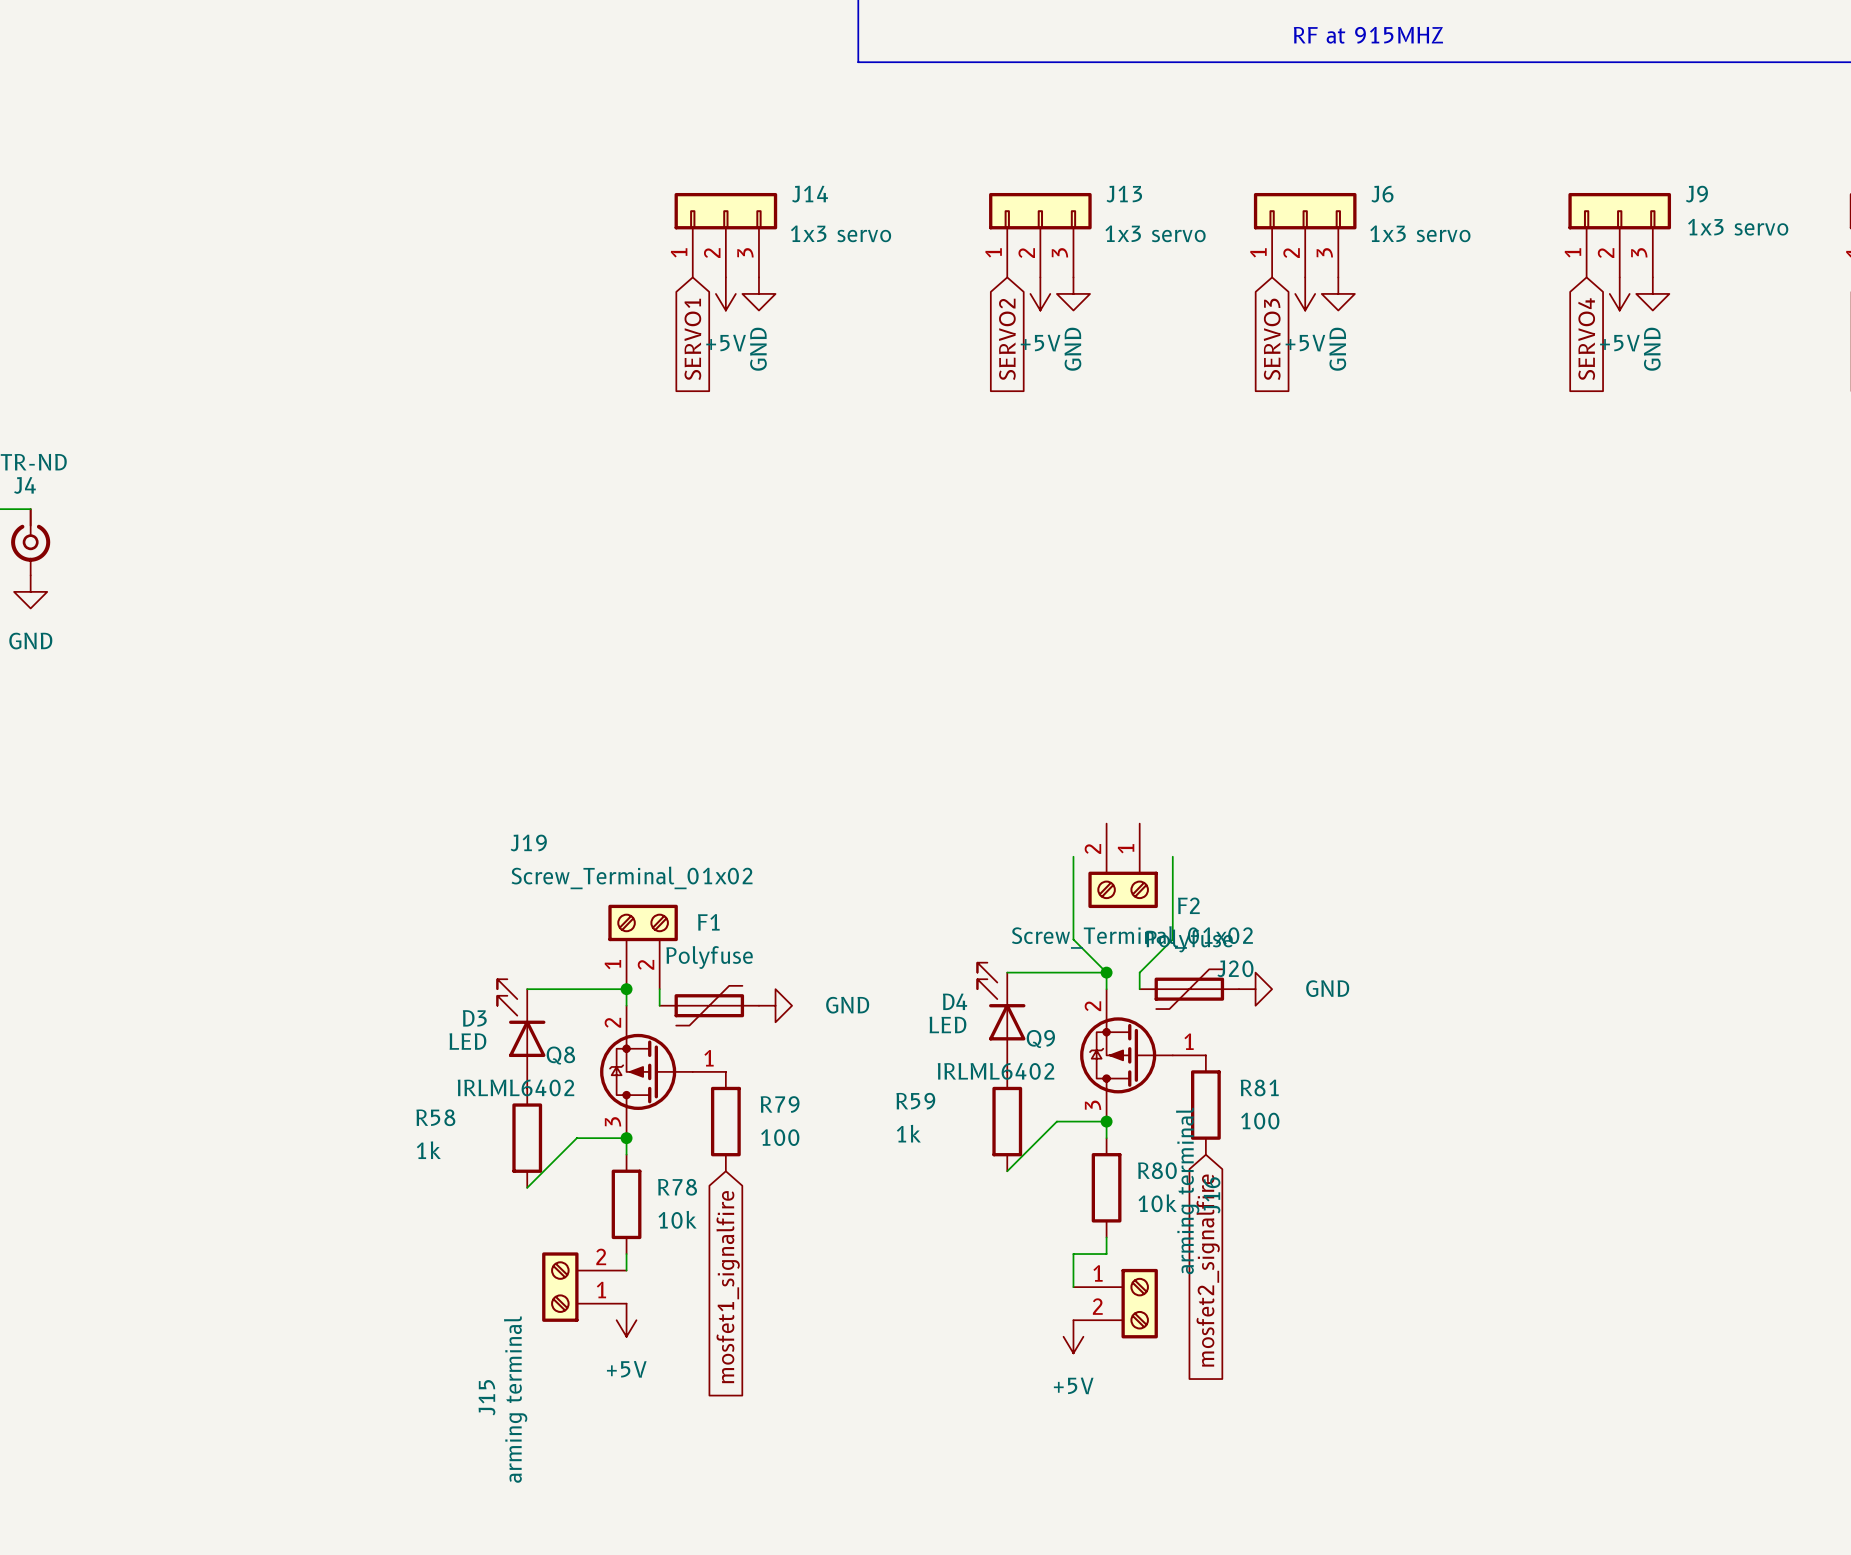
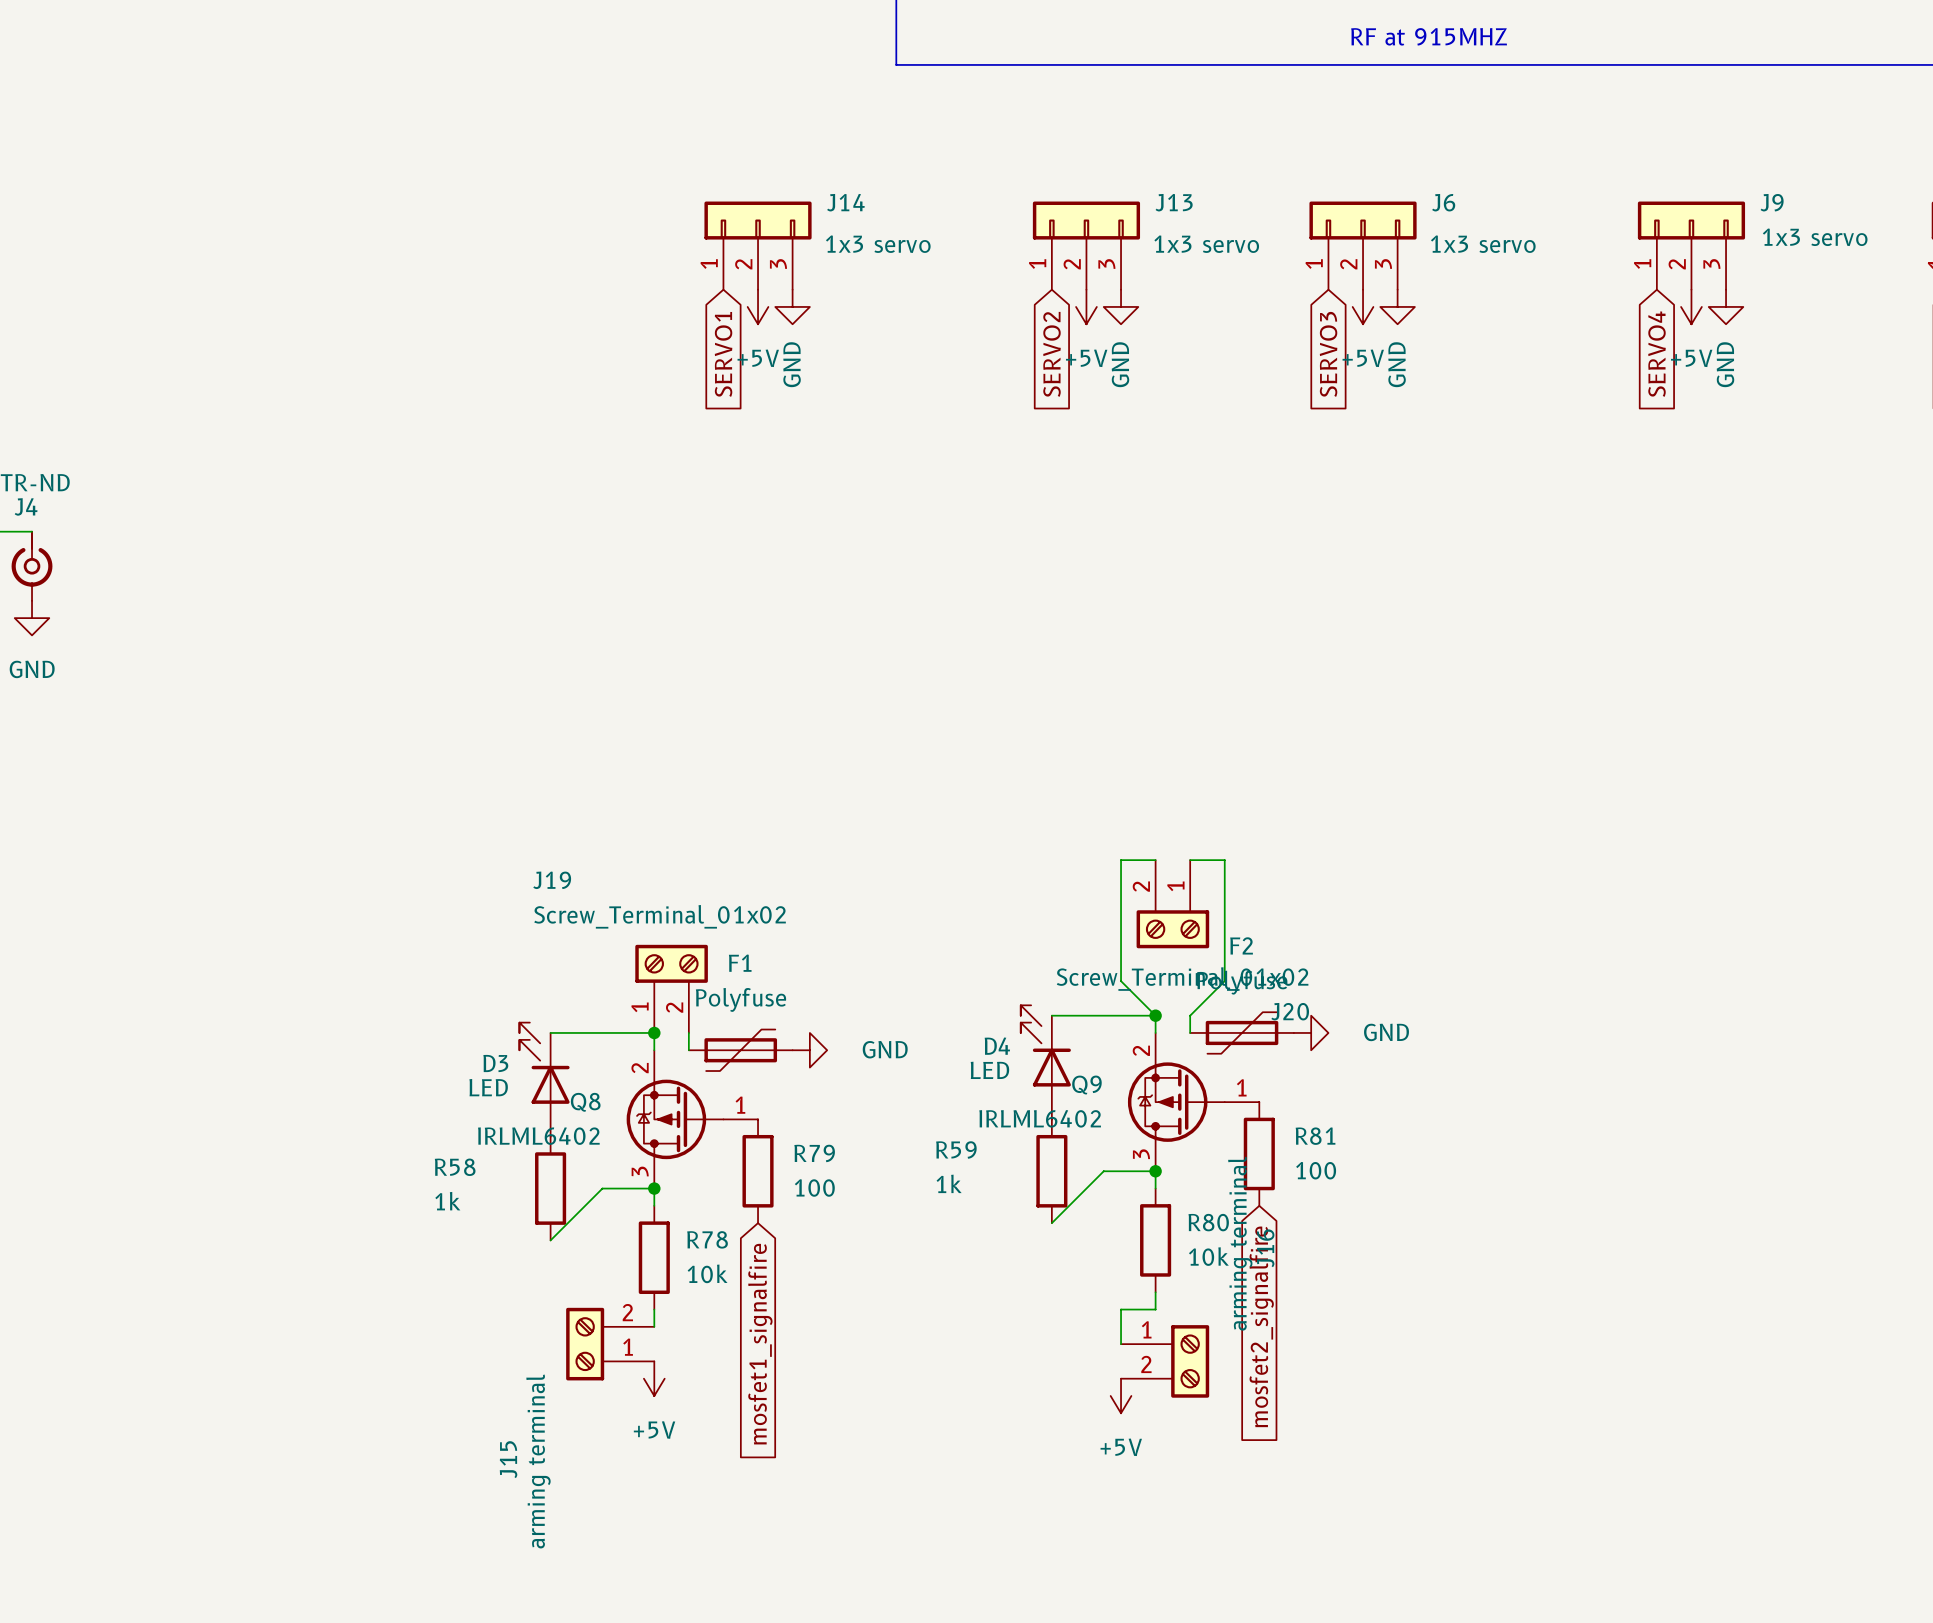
wire: none -> (1155, 860) (1121, 860) (1121, 894)
wire: none -> (1190, 860) (1224, 860) (1224, 894)

